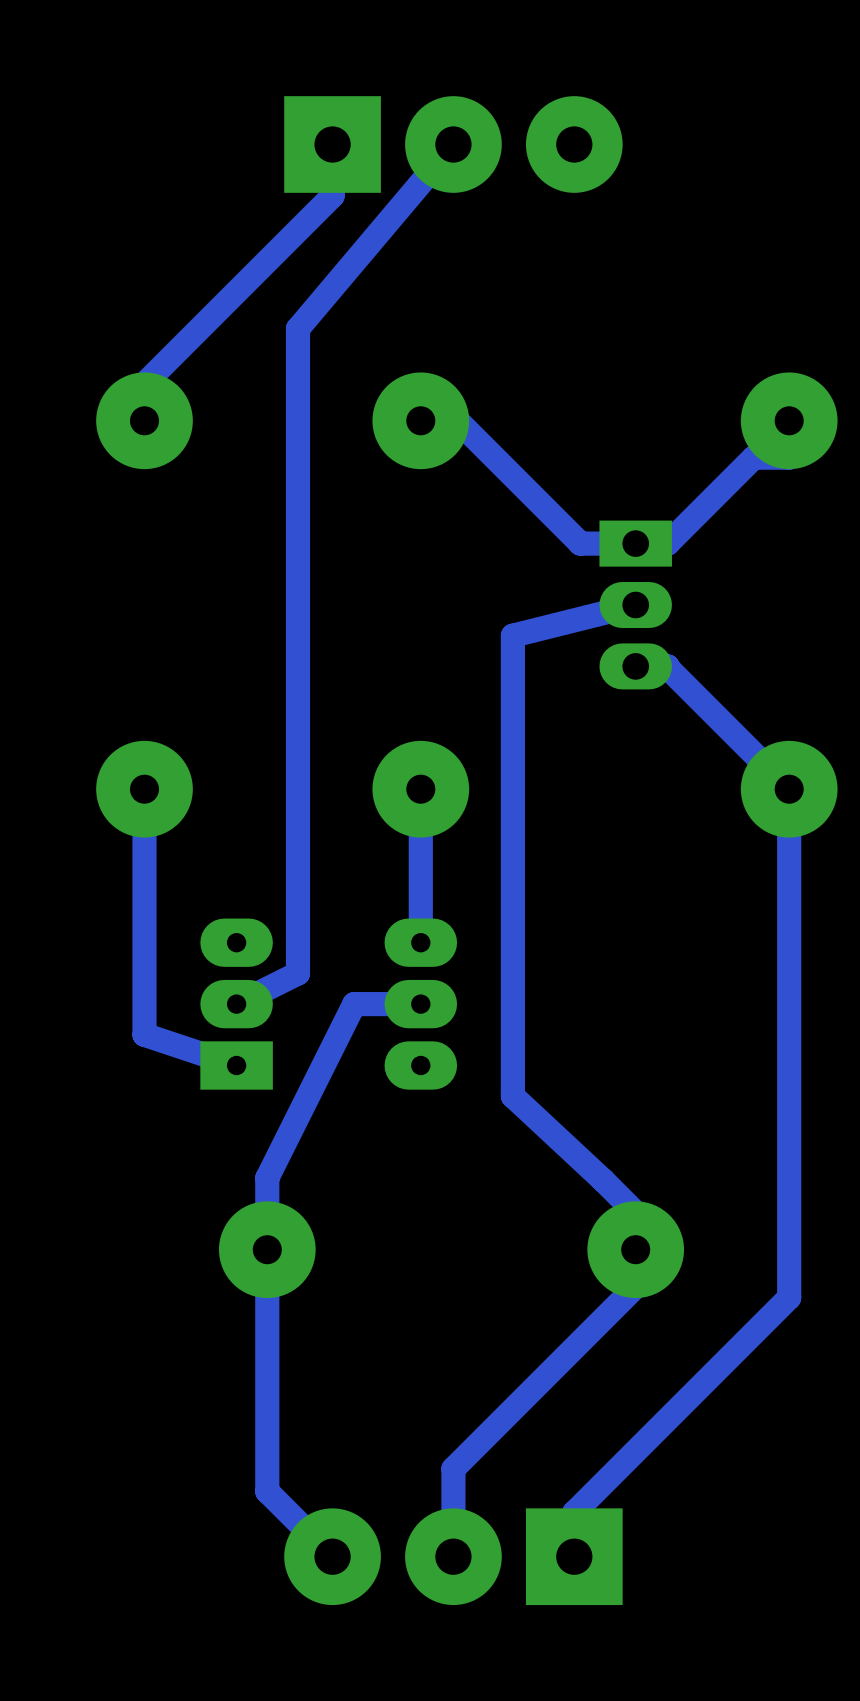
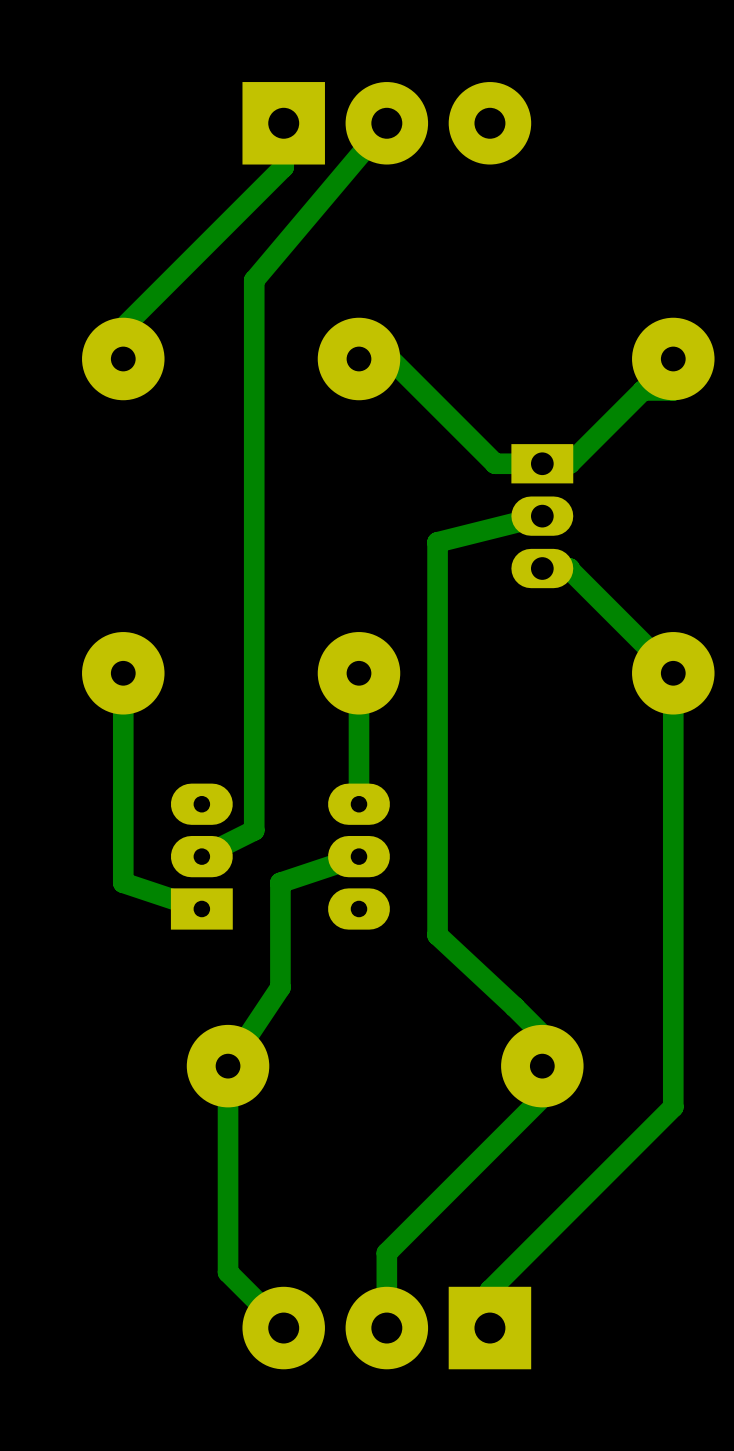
bottom track: (420, 1004) (354, 1004) (267, 1178) (267, 1249) -> (358, 856) (280, 882) (280, 987) (228, 1066)

